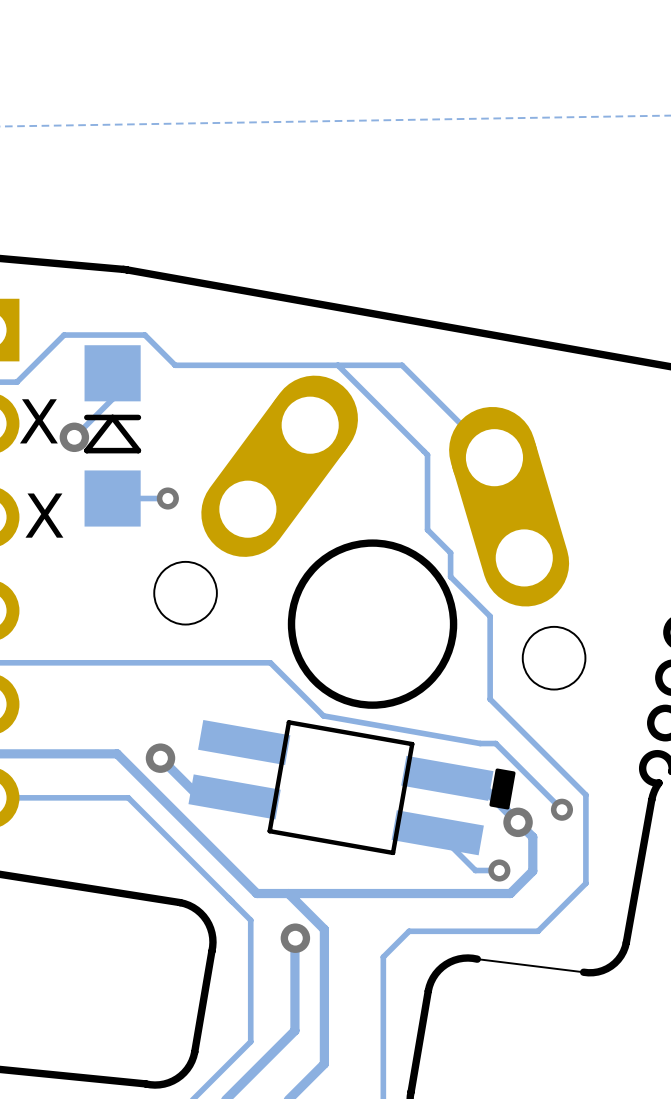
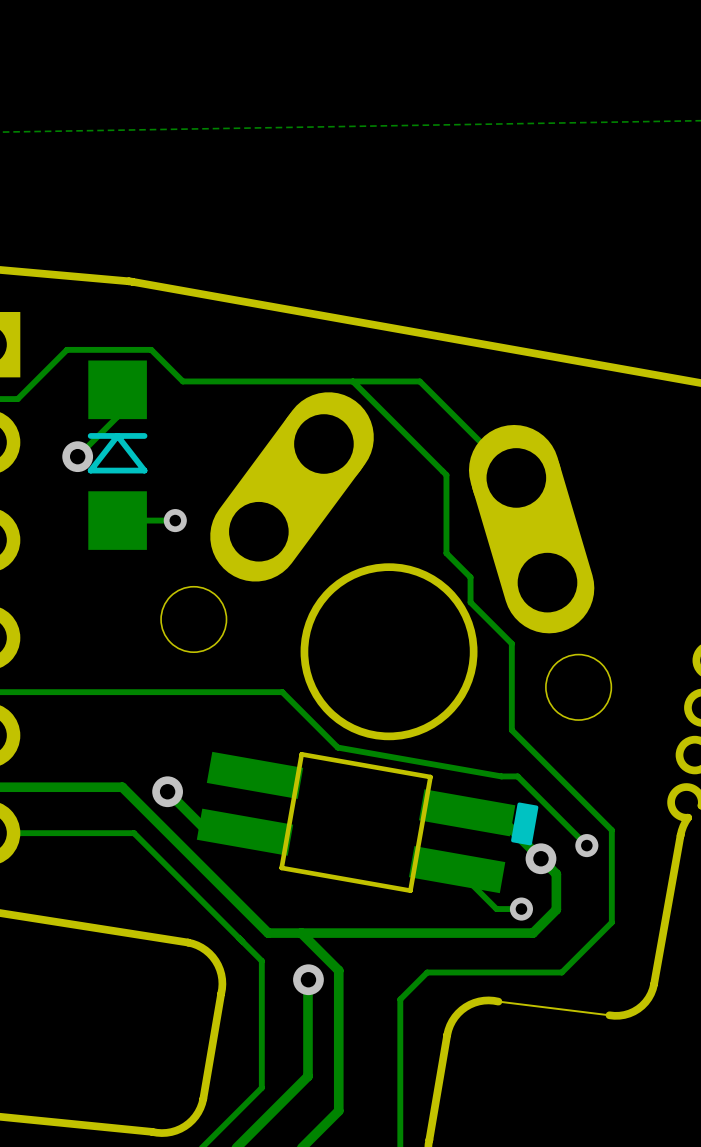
text: X (38, 421) -> none
text: X (44, 515) -> none

